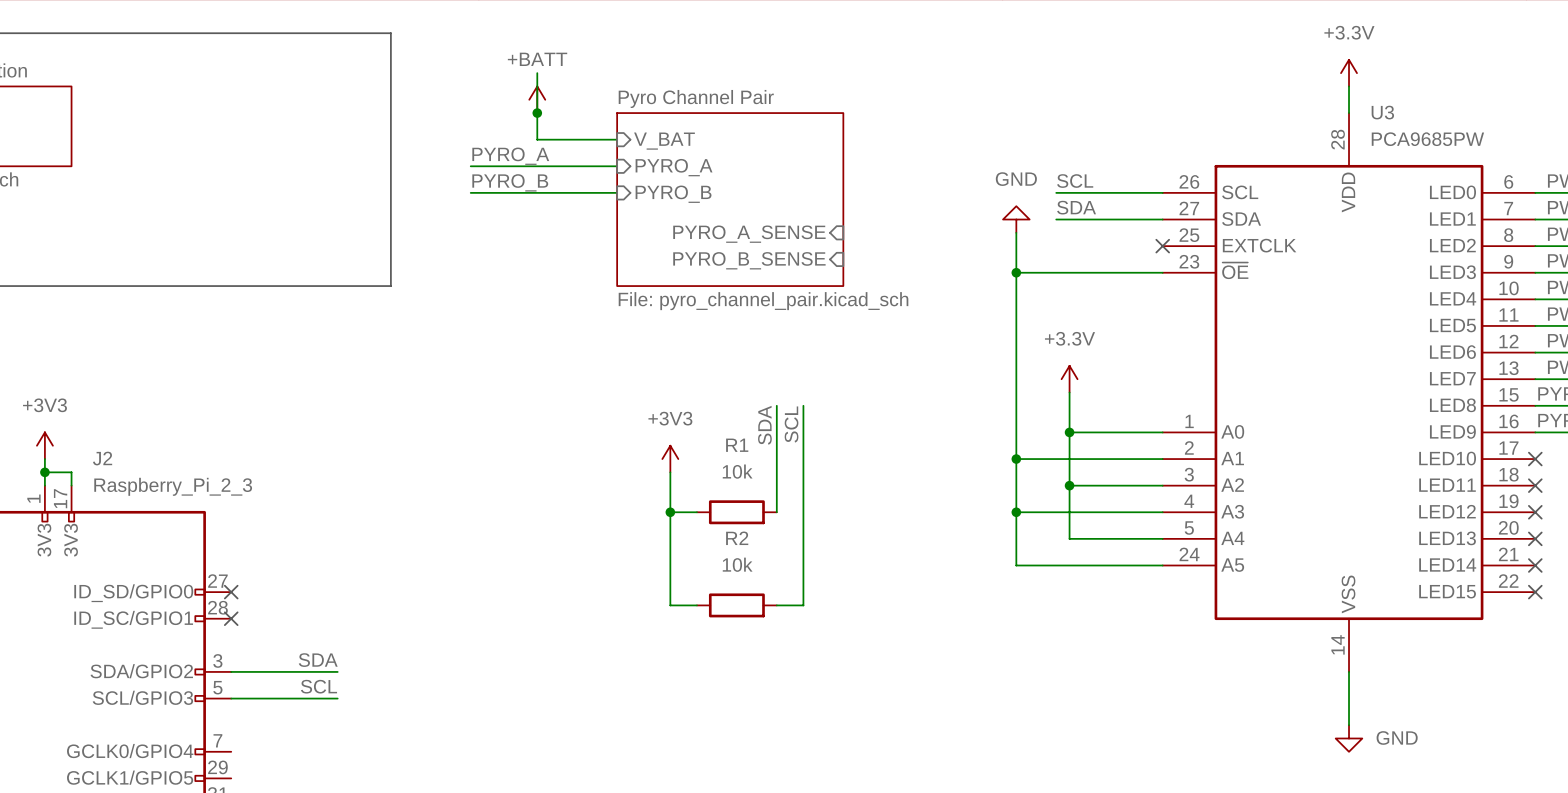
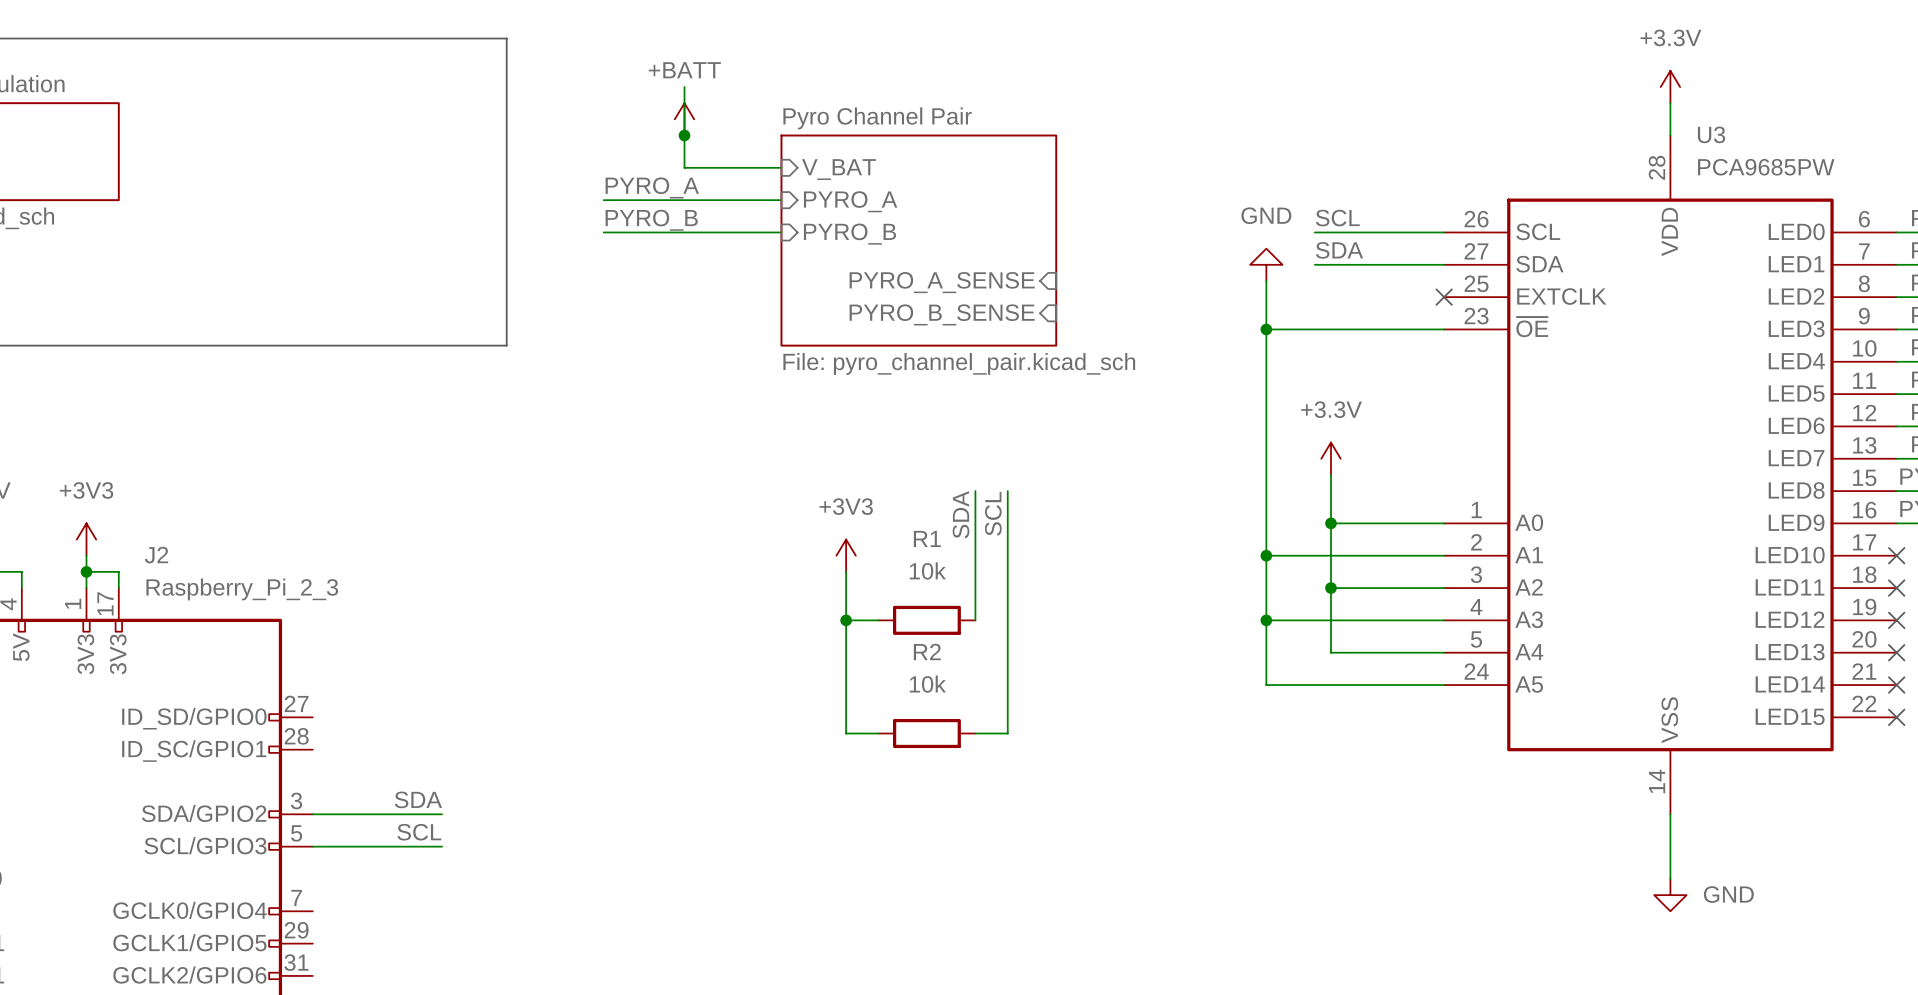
no-connect mark: (231, 592) -> none
no-connect mark: (231, 618) -> none

